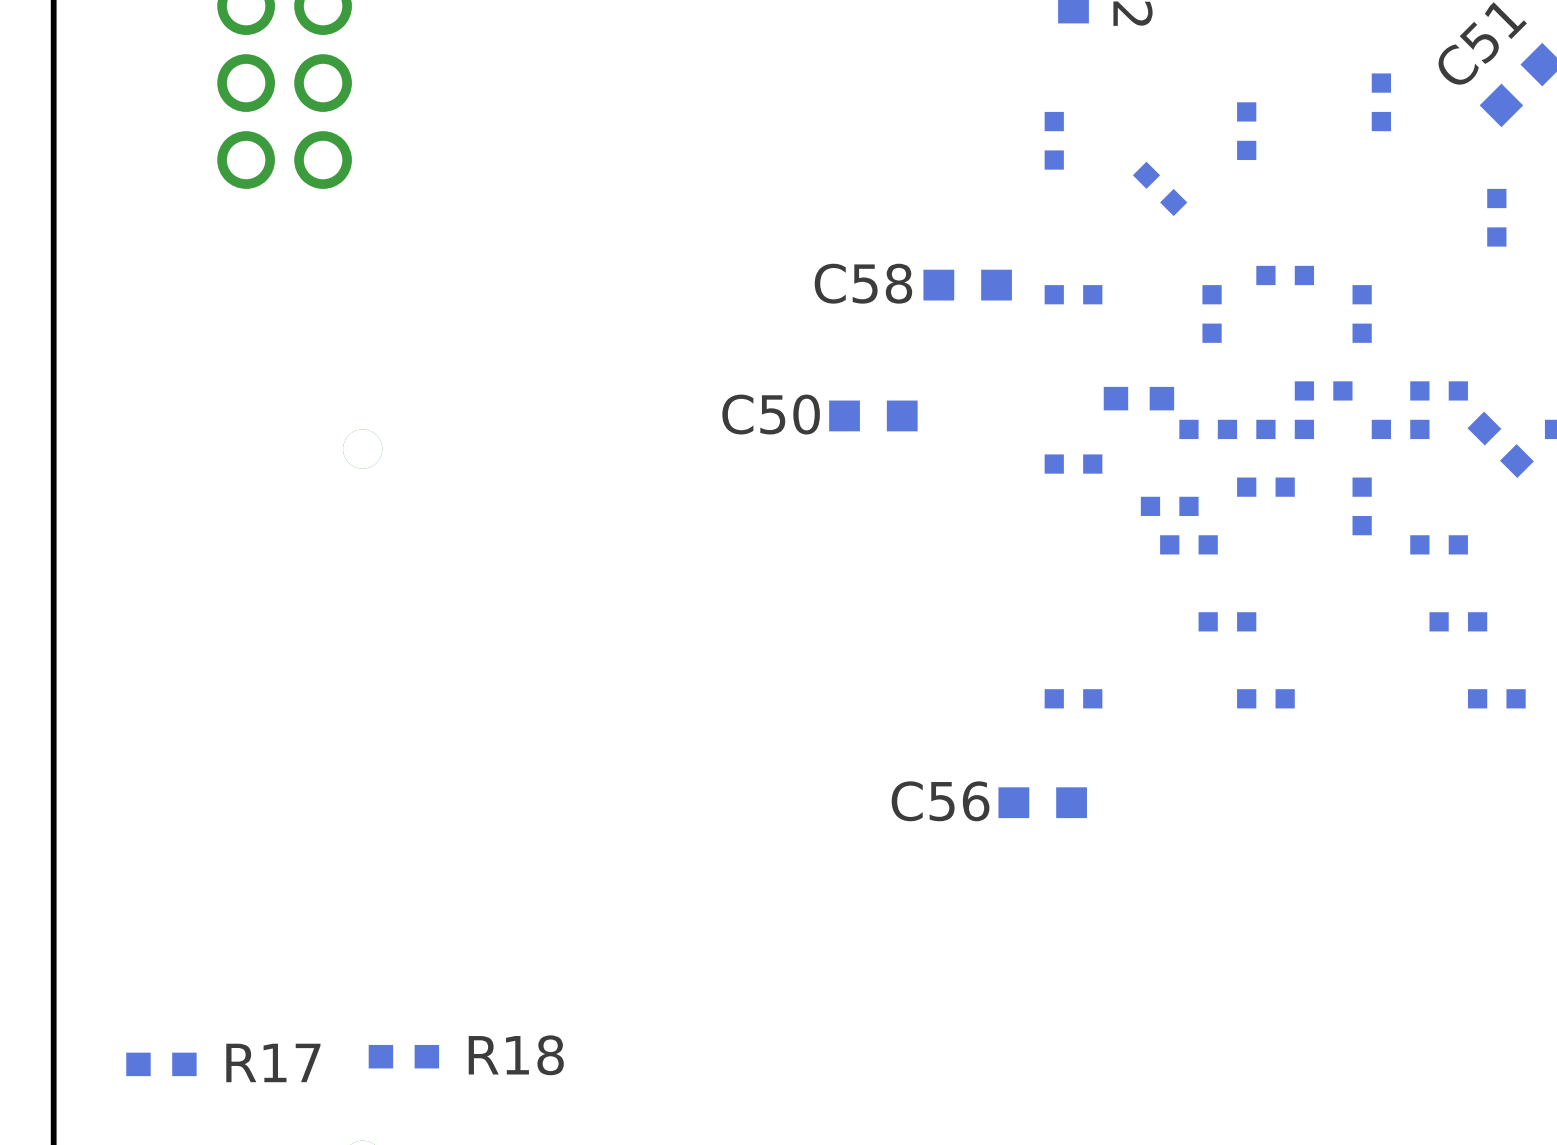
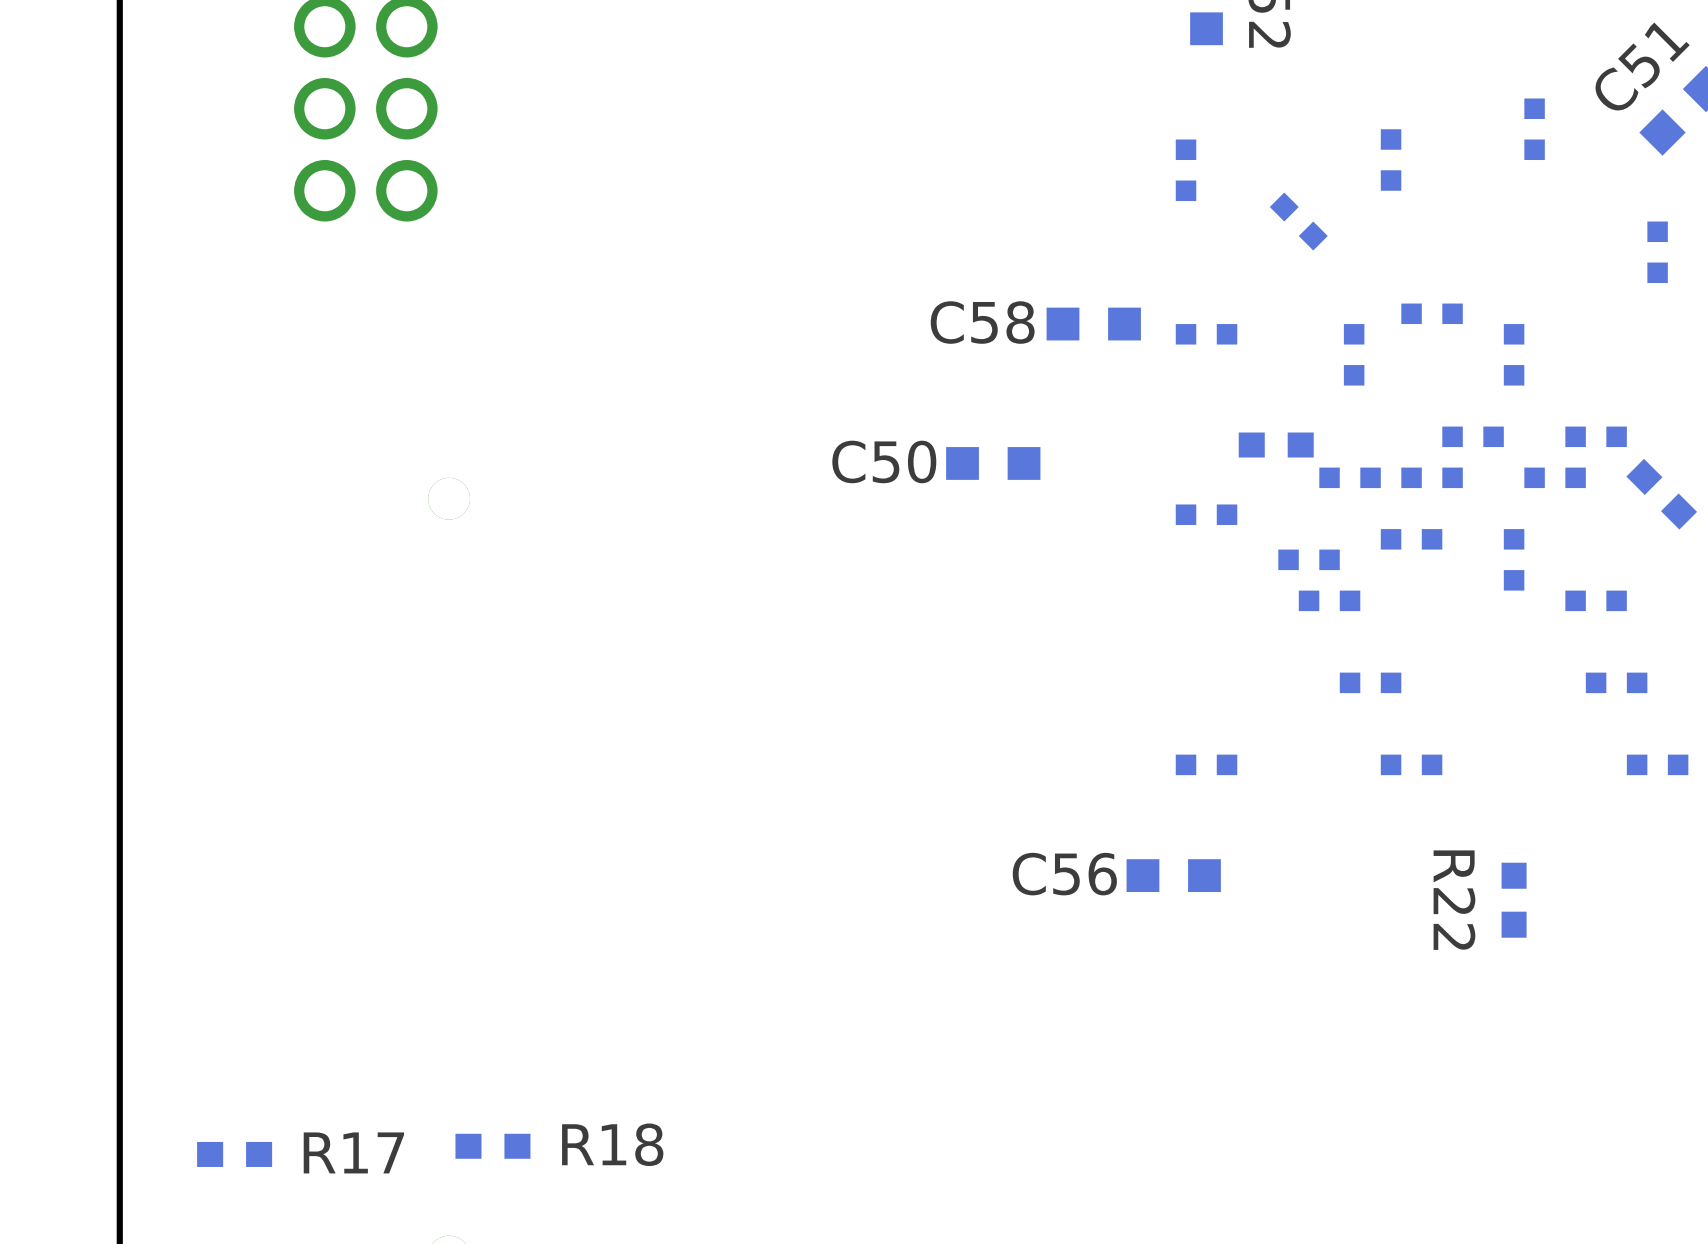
R22: none -> (1514, 900)

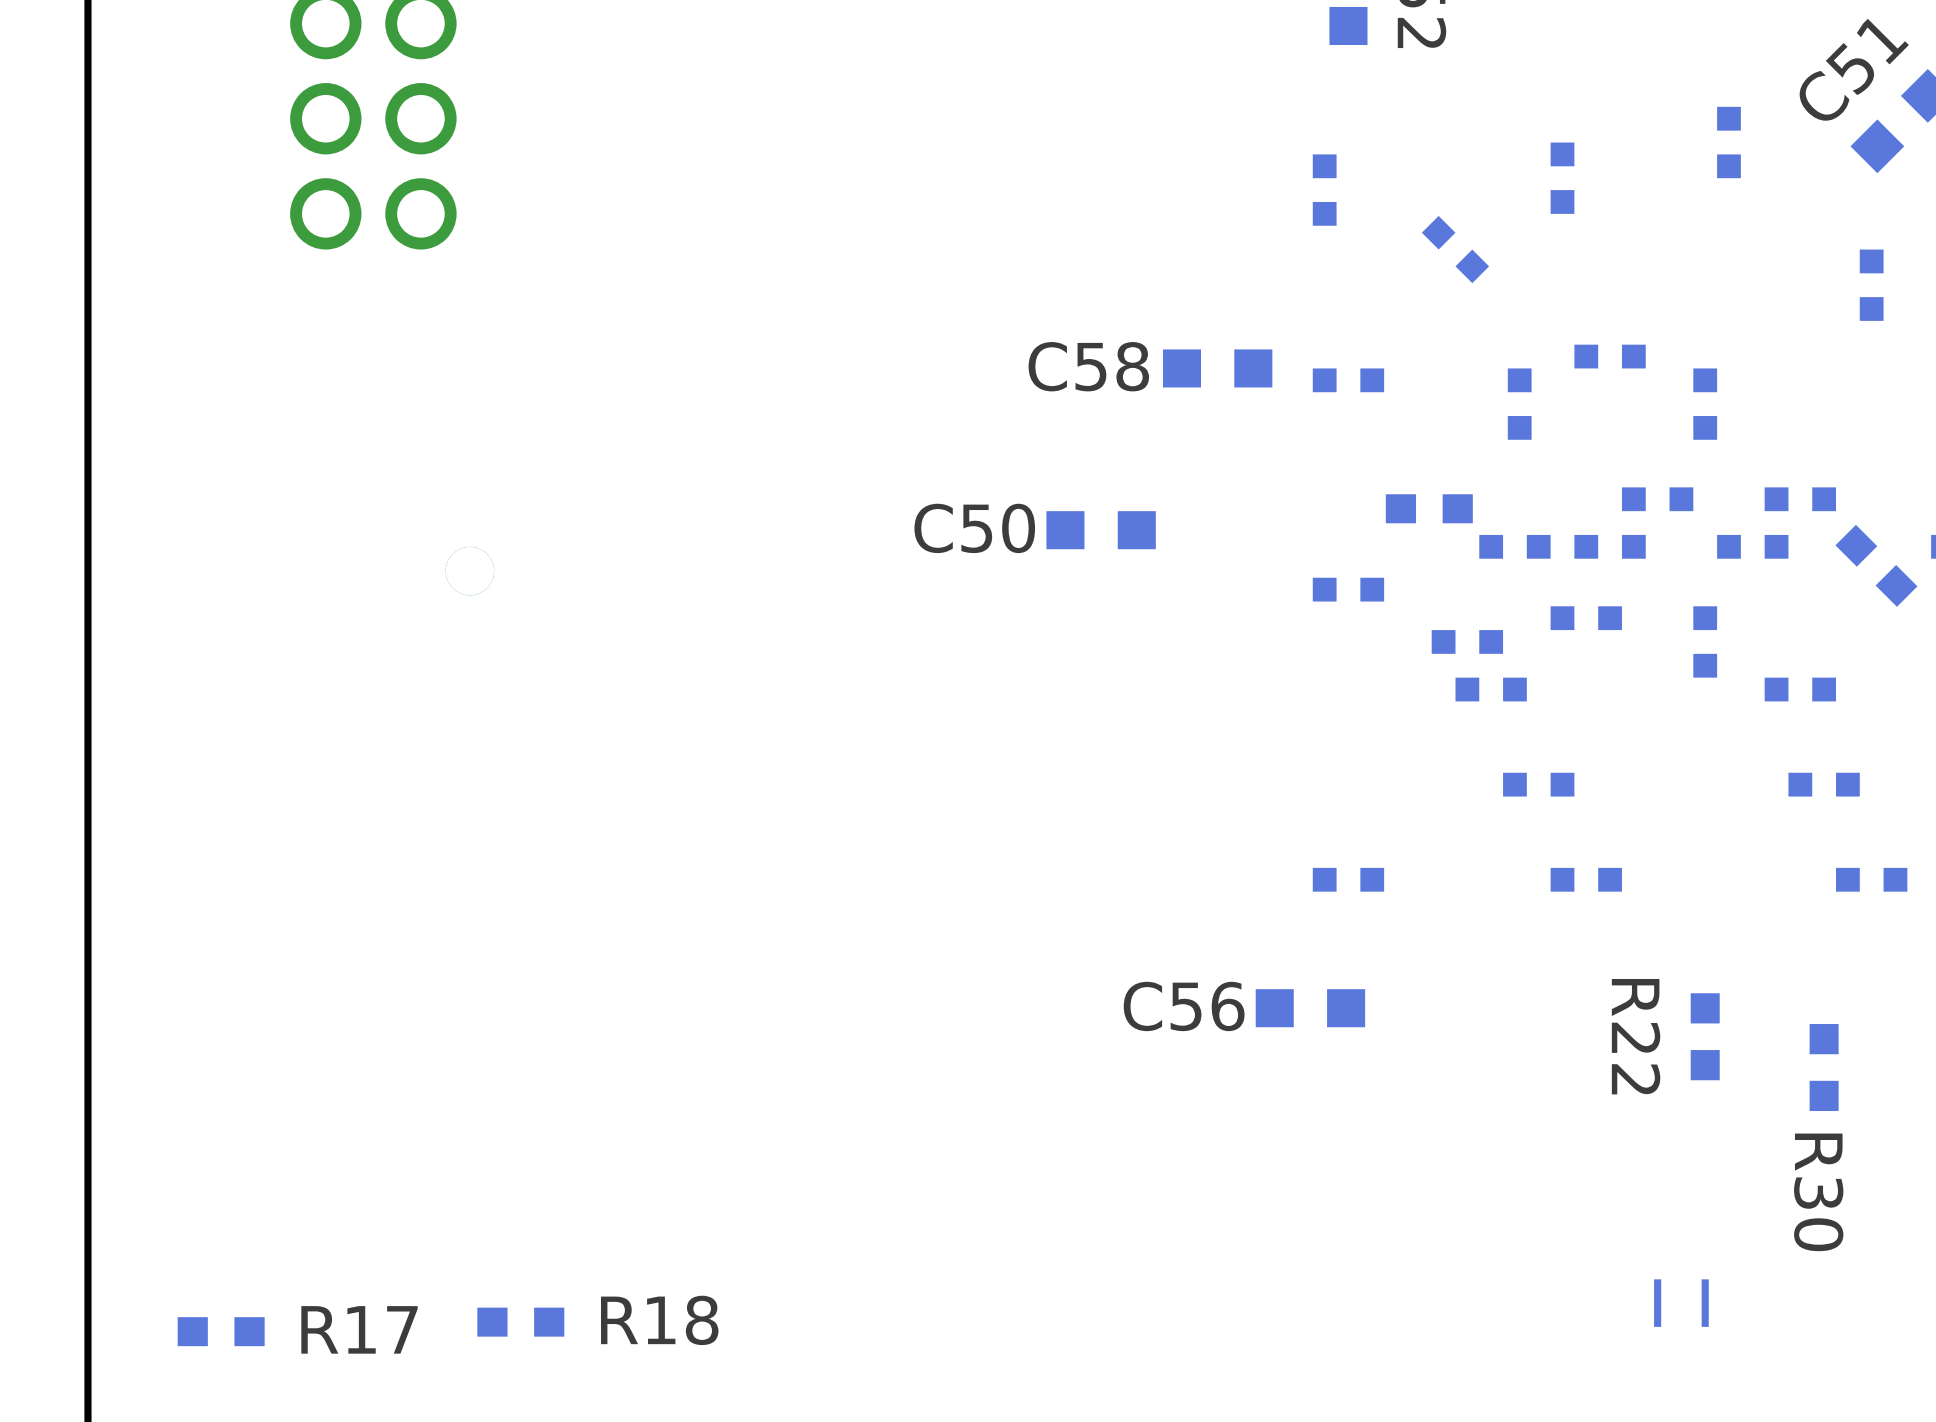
R30: none -> (1824, 1067)
part: none -> (1657, 1303)
part: none -> (1705, 1303)

